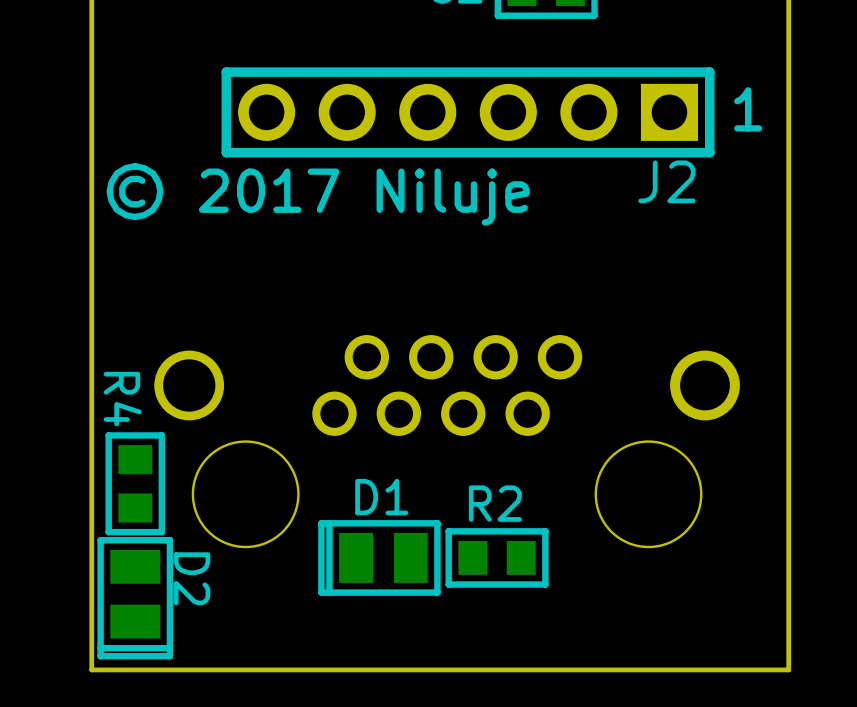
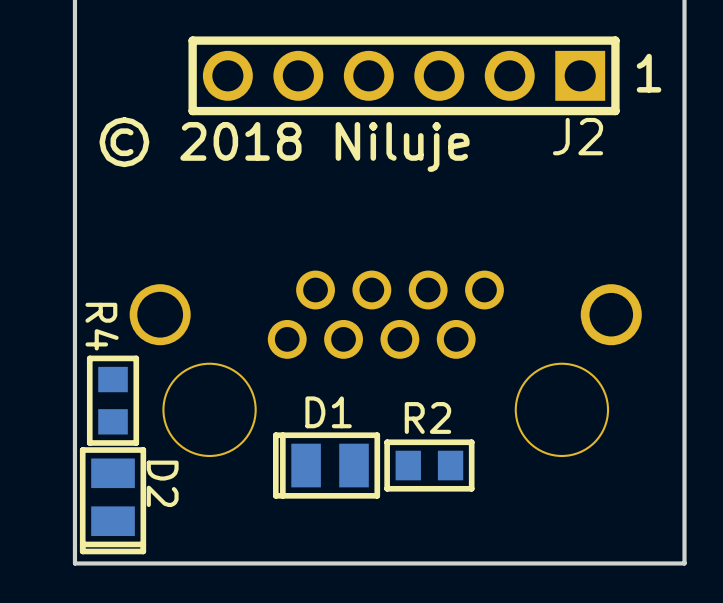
text: © 2017 Niluje (318, 194) -> © 2018 Niluje (284, 144)

